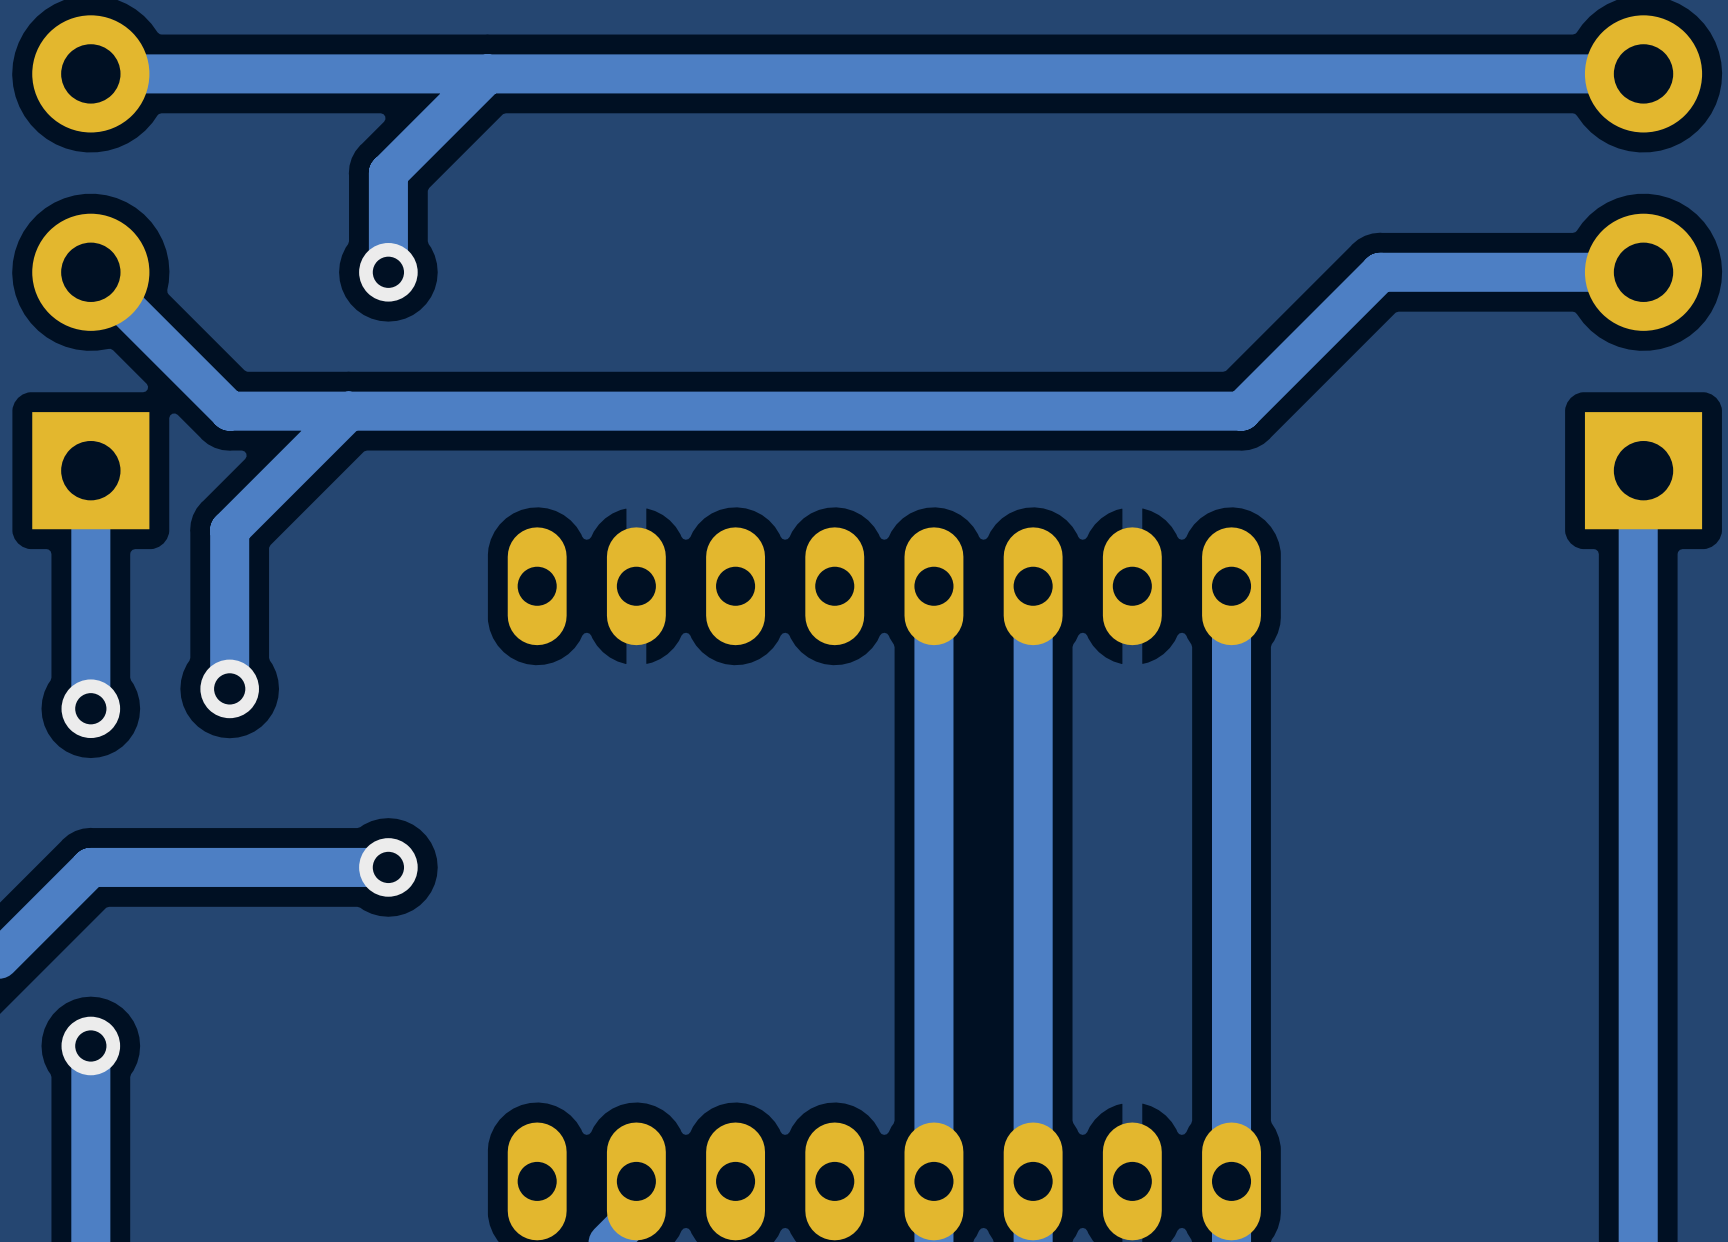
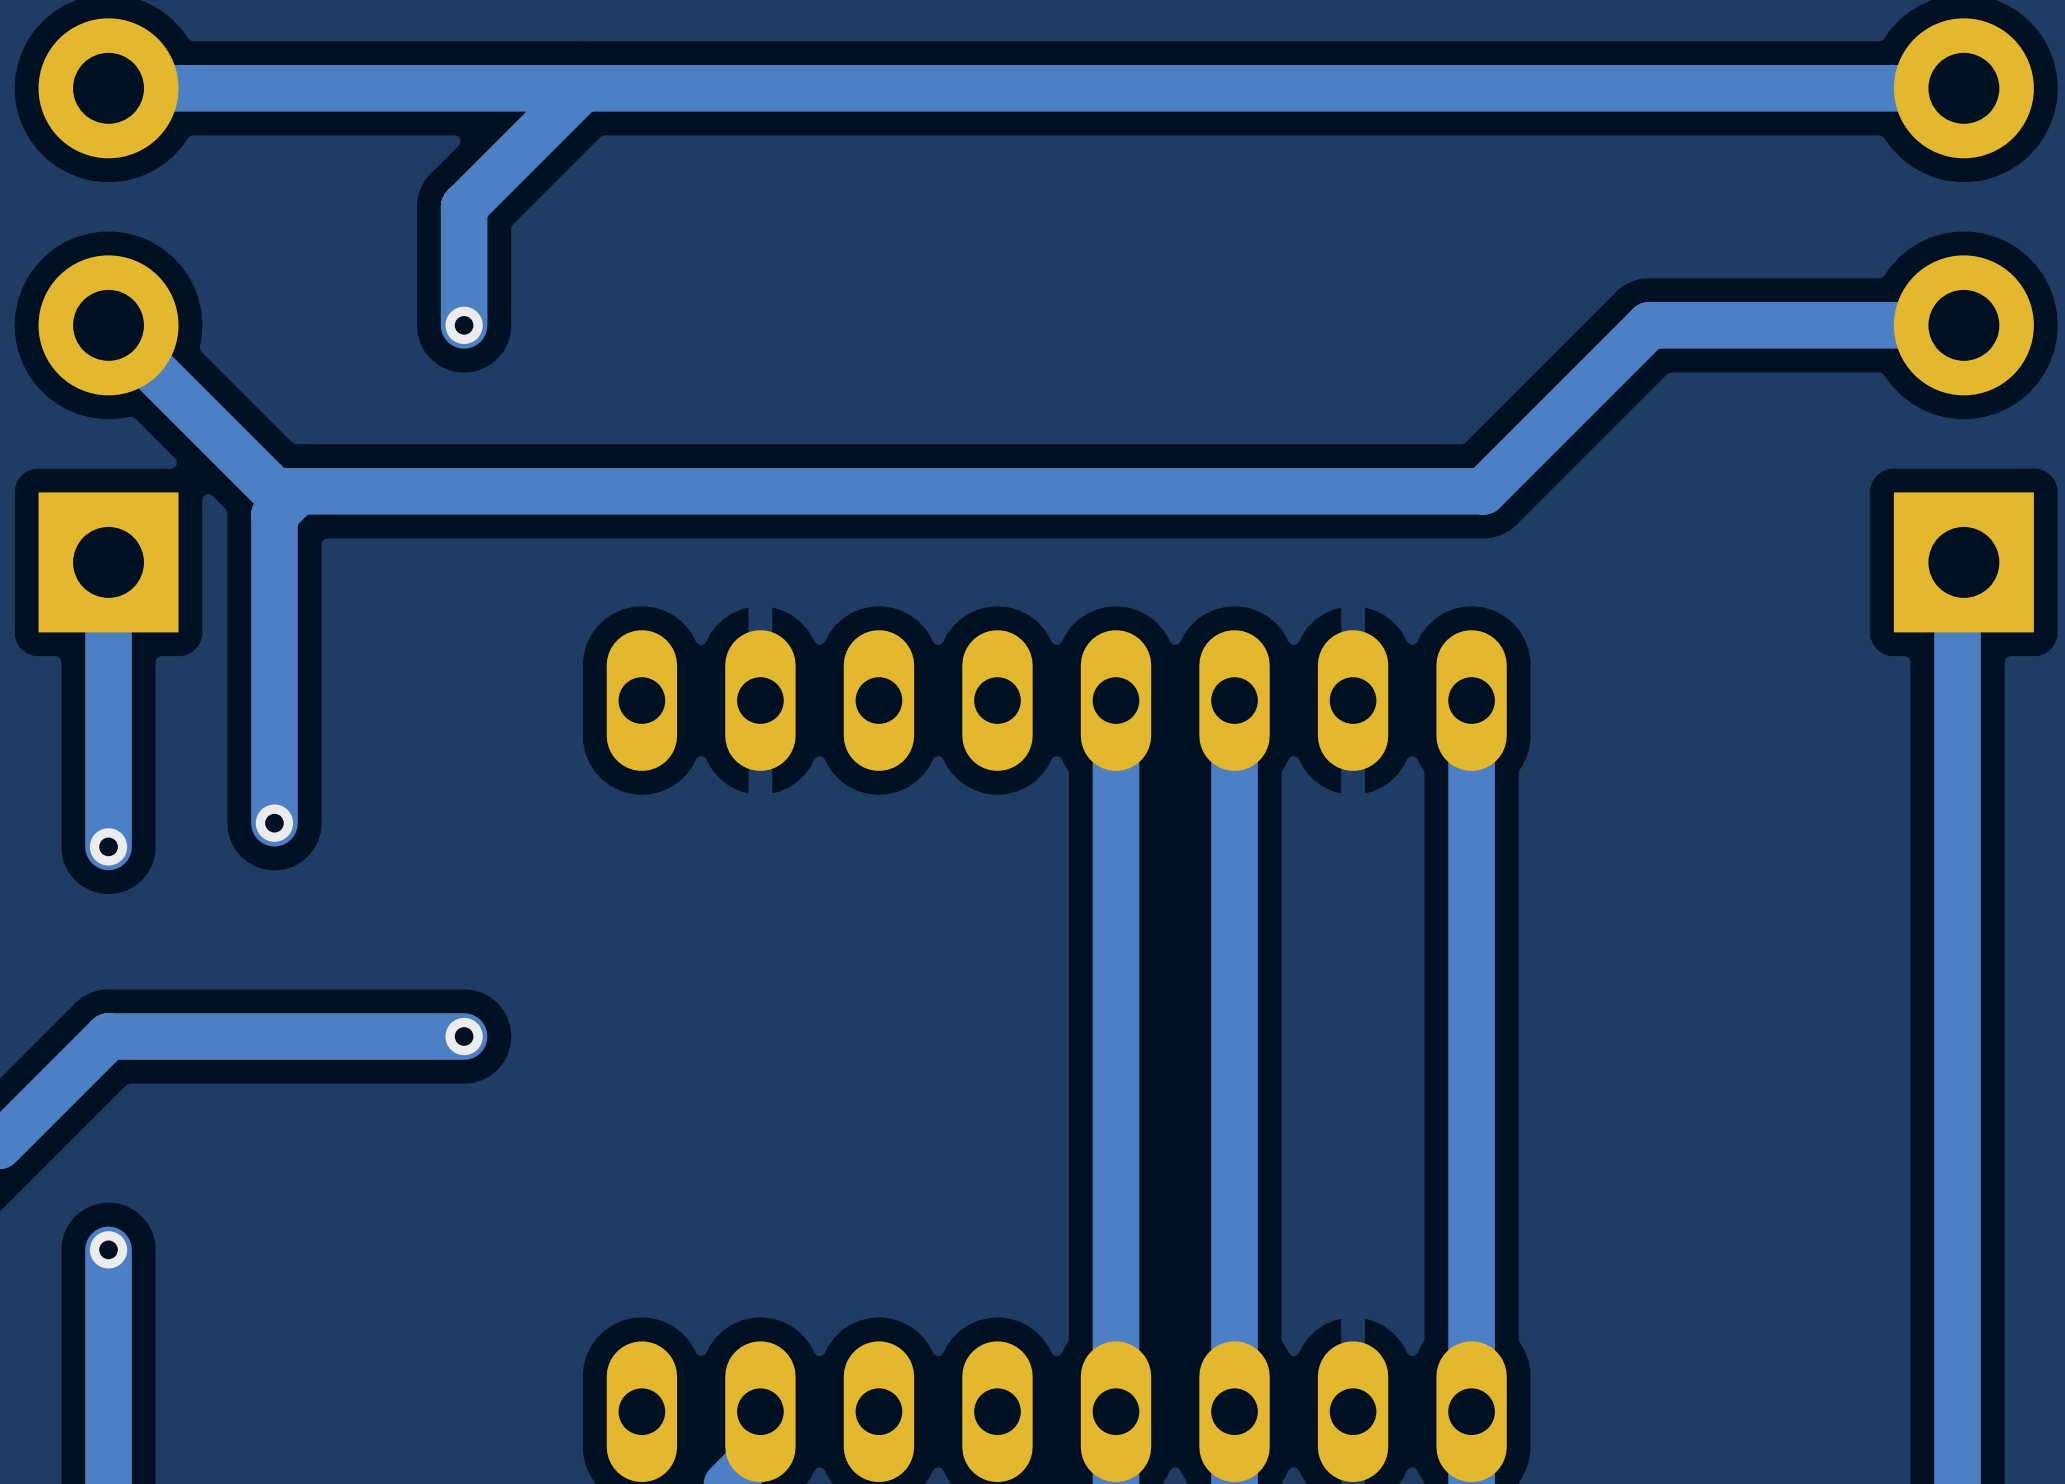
via size: [359, 243, 418, 302] -> [445, 306, 483, 345]
track: (348, 411) (229, 530) -> (298, 491) (274, 515) (274, 633)
via size: [200, 659, 259, 719] -> [255, 804, 294, 842]
via size: [61, 679, 121, 739] -> [89, 828, 128, 866]
via size: [359, 838, 418, 897] -> [445, 1017, 483, 1056]
via size: [61, 1016, 121, 1076] -> [89, 1231, 128, 1269]

